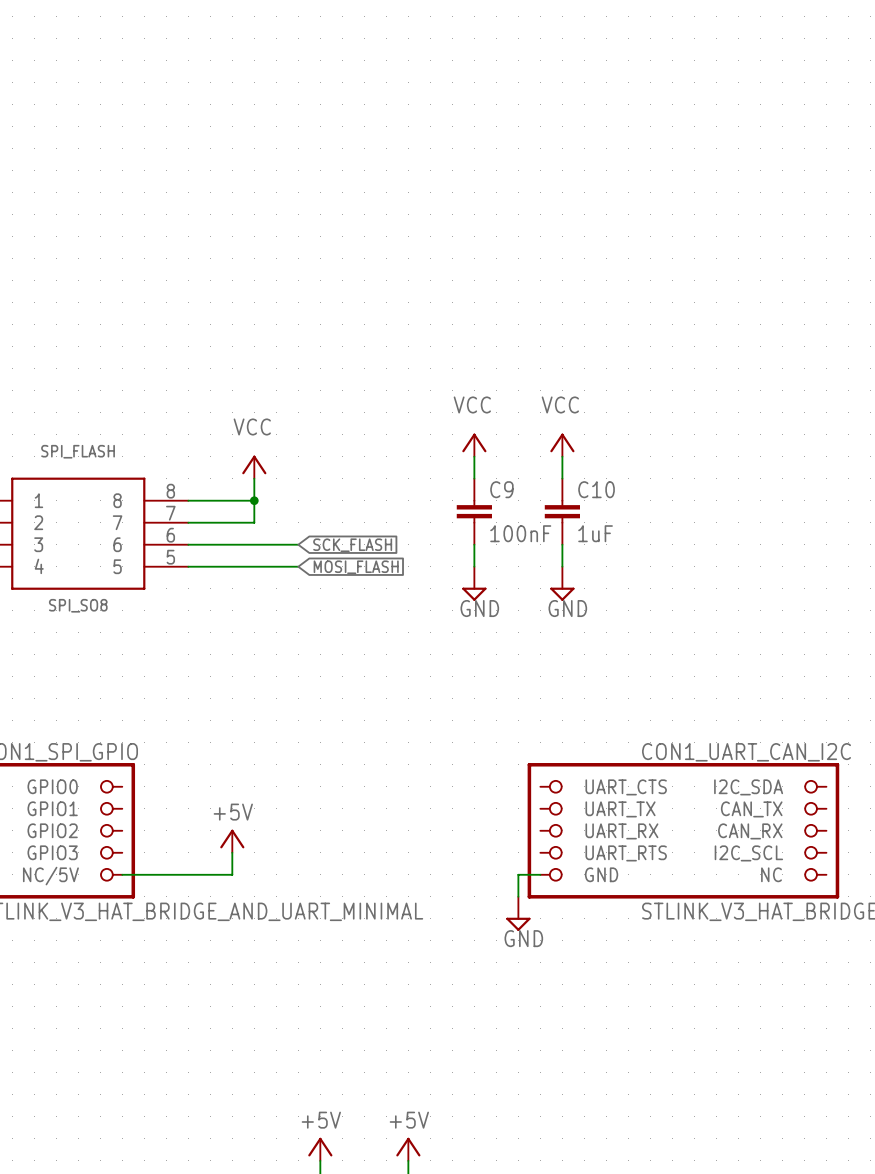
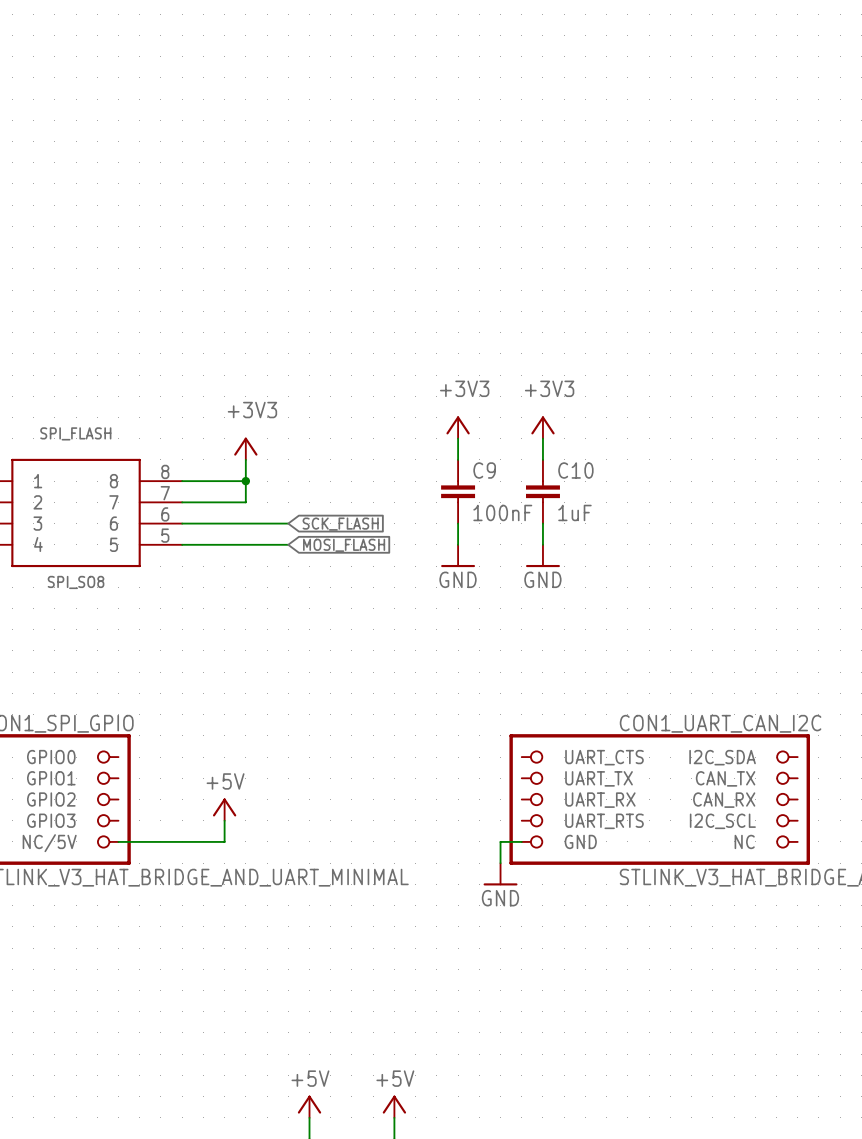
power symbol: VCC (474, 445) -> +3V3 (458, 427)
power symbol: VCC (562, 445) -> +3V3 (542, 427)
power symbol: VCC (254, 467) -> +3V3 (245, 448)
power symbol shape: [462, 566, 487, 601] -> [441, 544, 476, 568]
power symbol shape: [550, 566, 575, 601] -> [526, 544, 560, 568]
power symbol shape: [506, 896, 531, 931] -> [483, 863, 518, 886]

